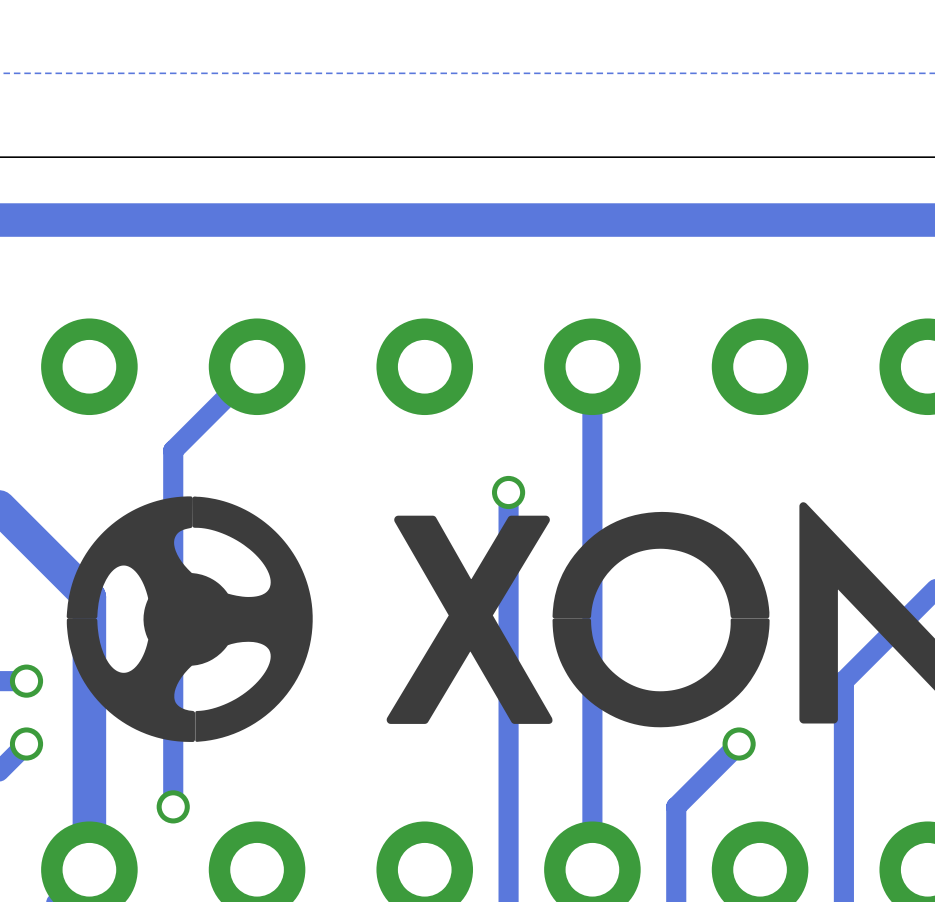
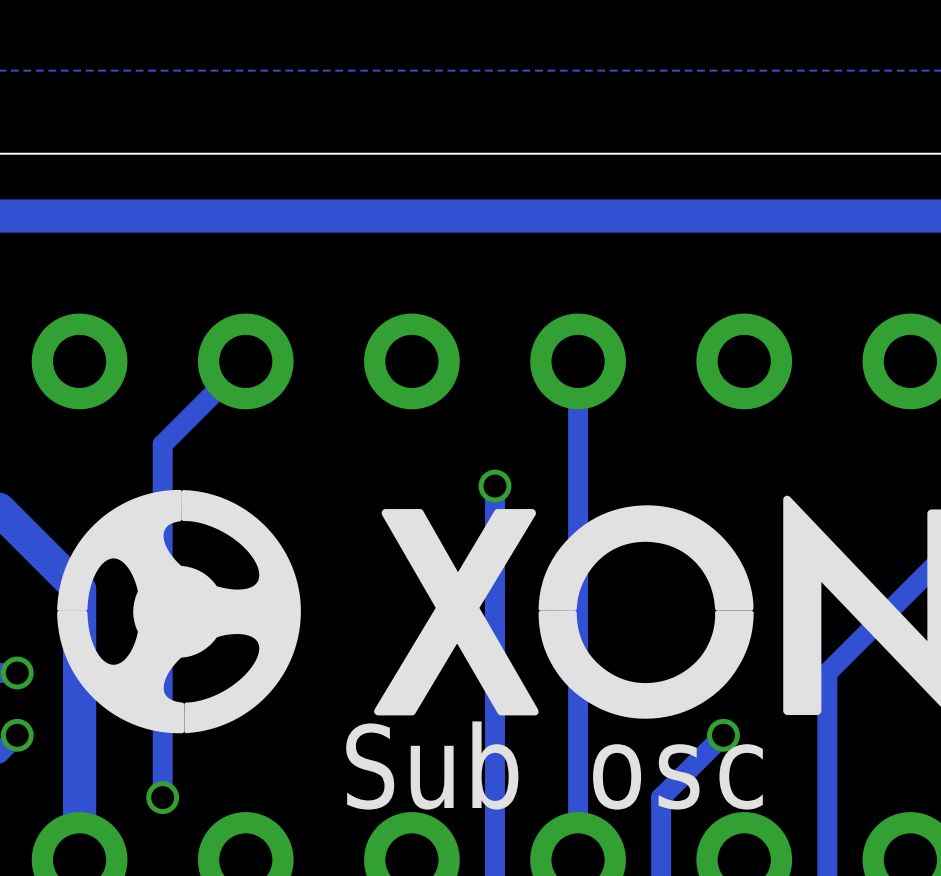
text: none -> Sub osc (554, 765)

